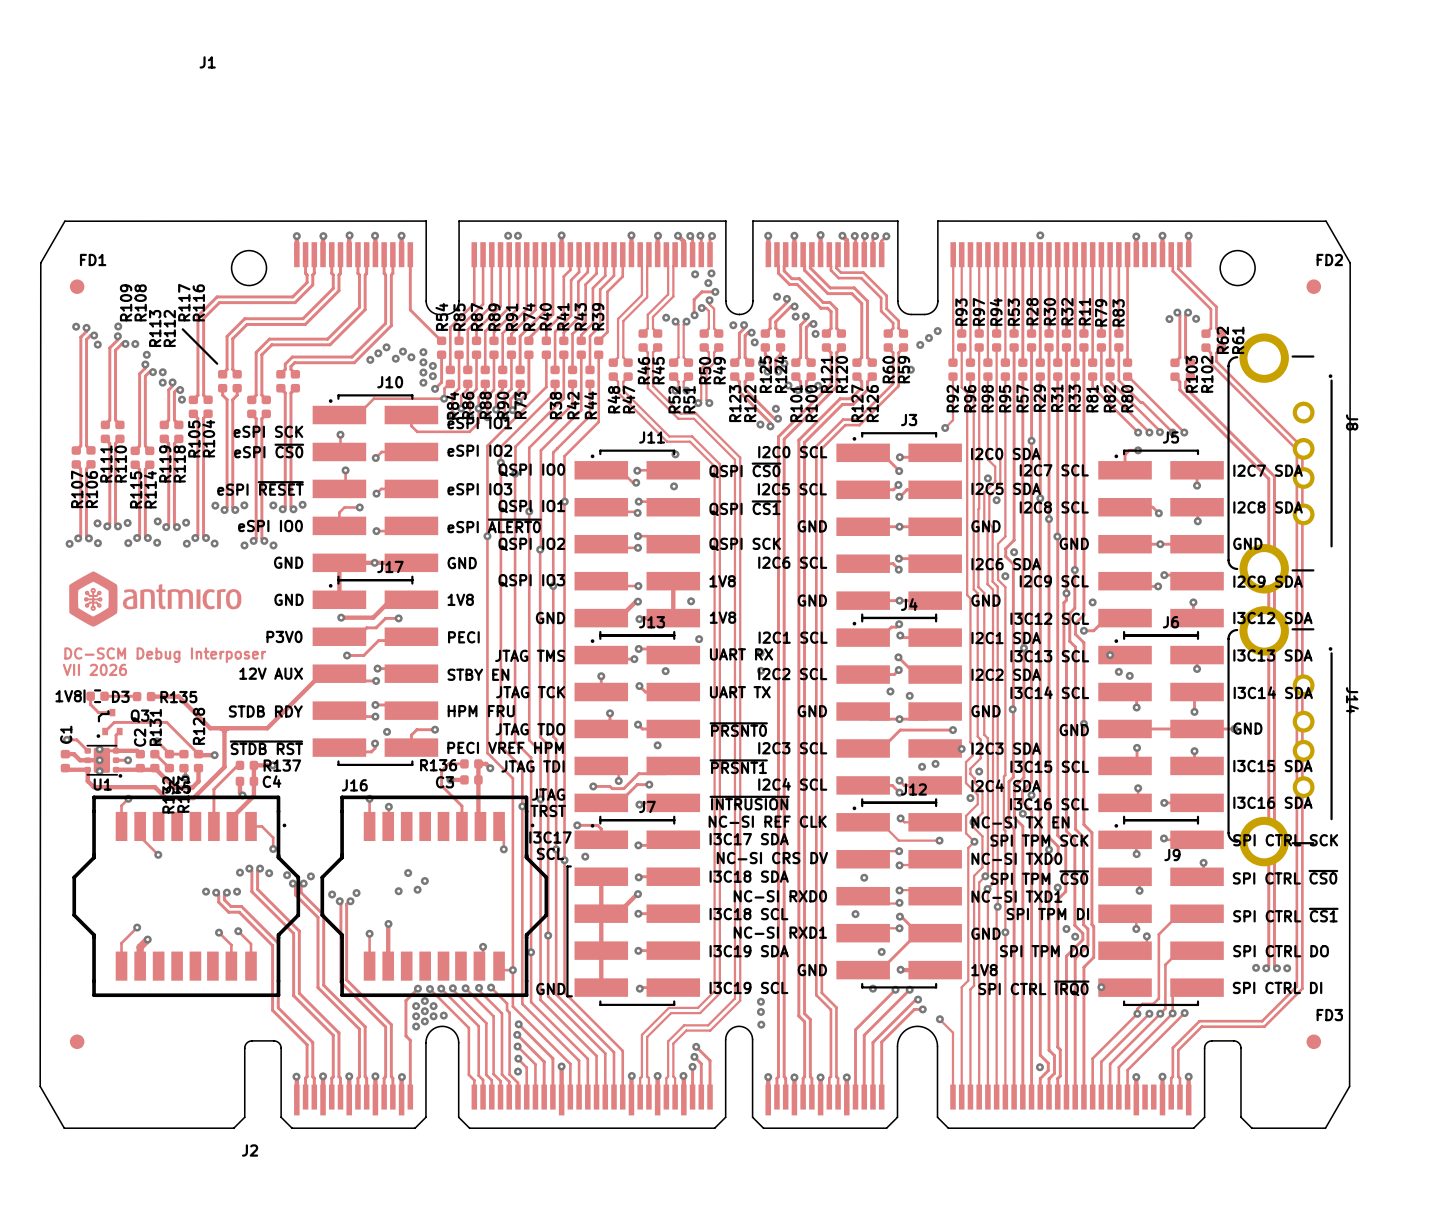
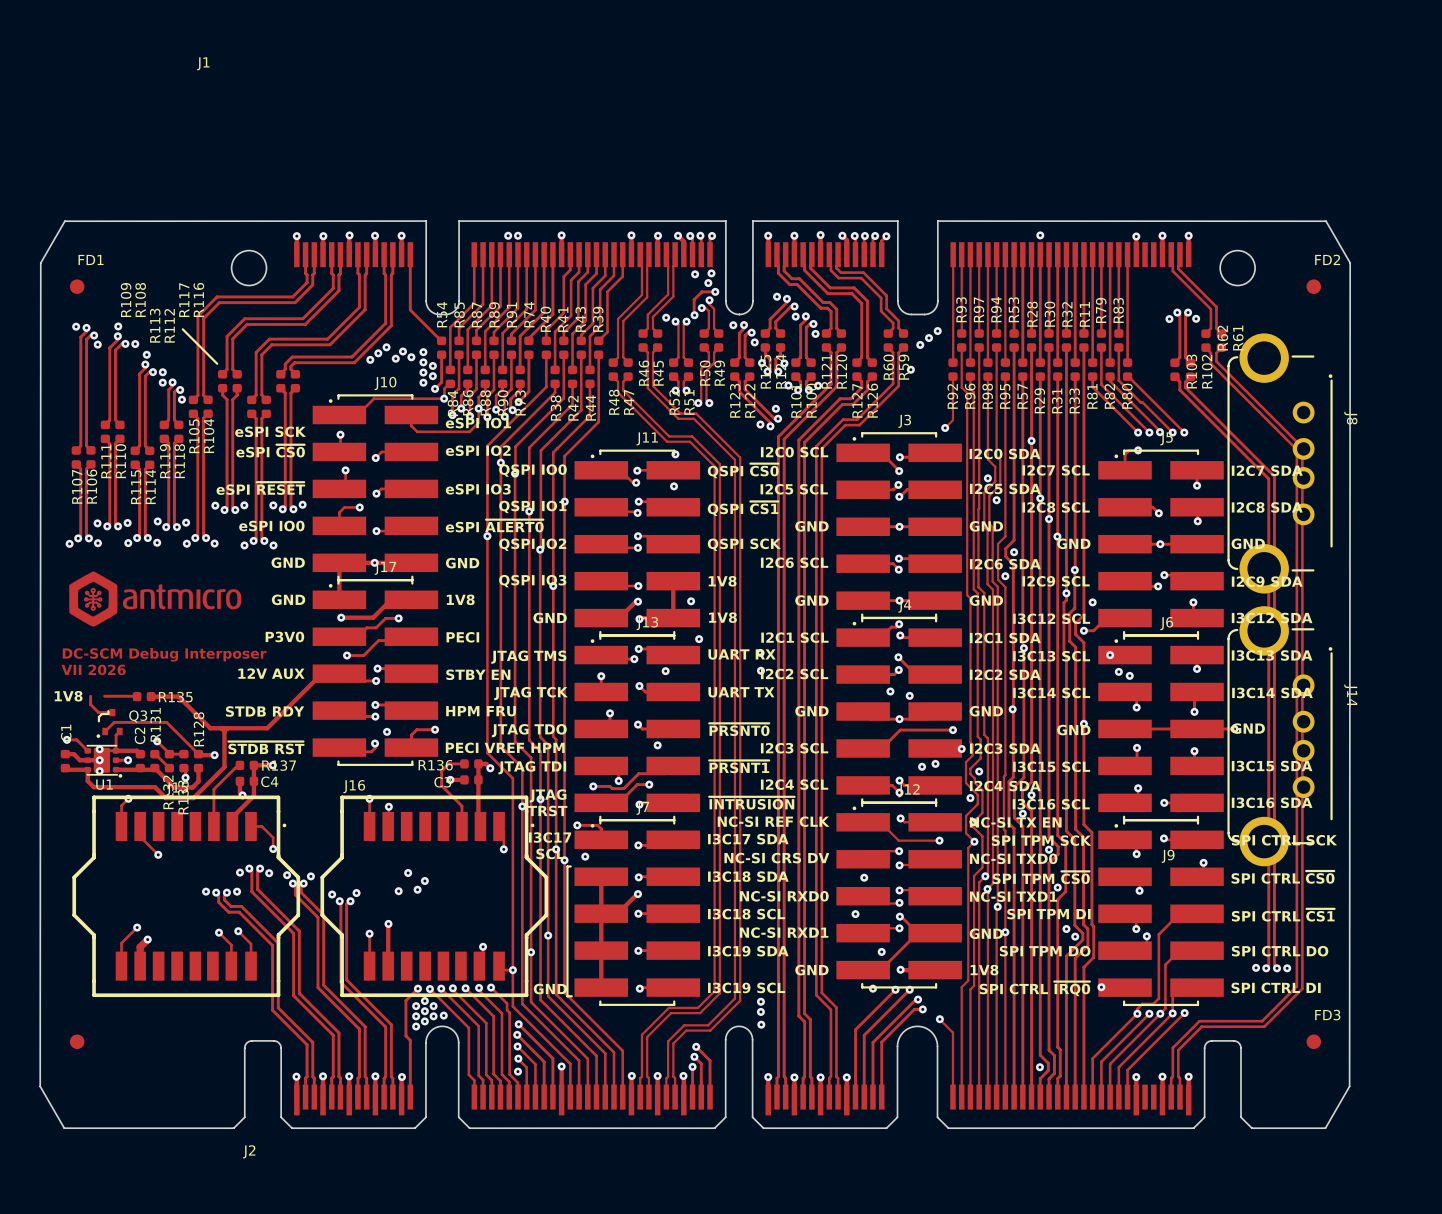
D3: (96, 696) -> none

